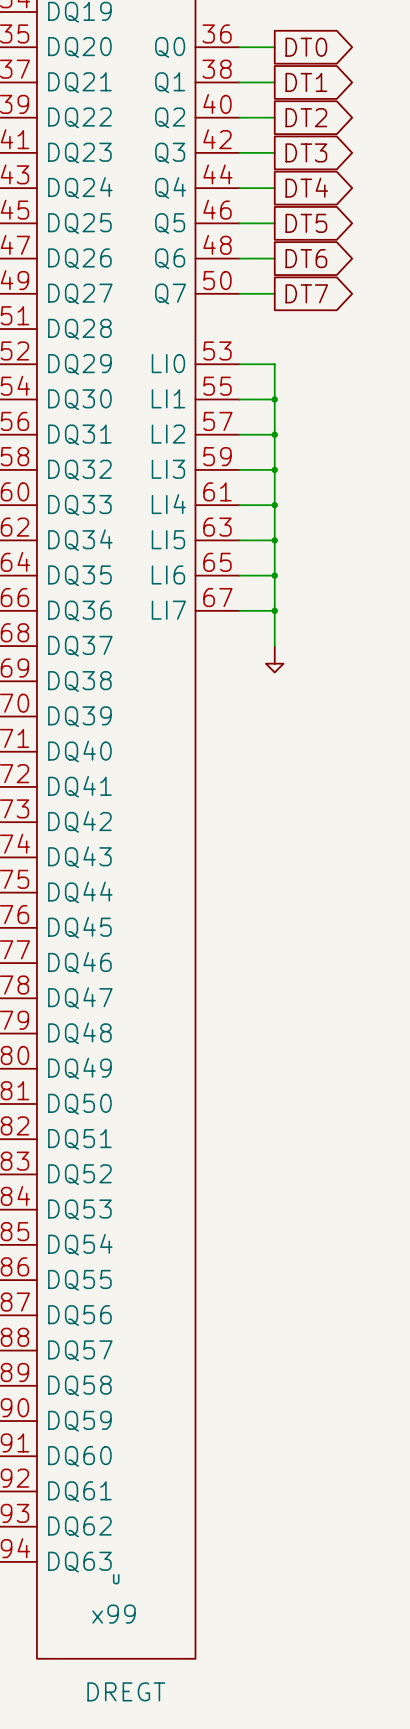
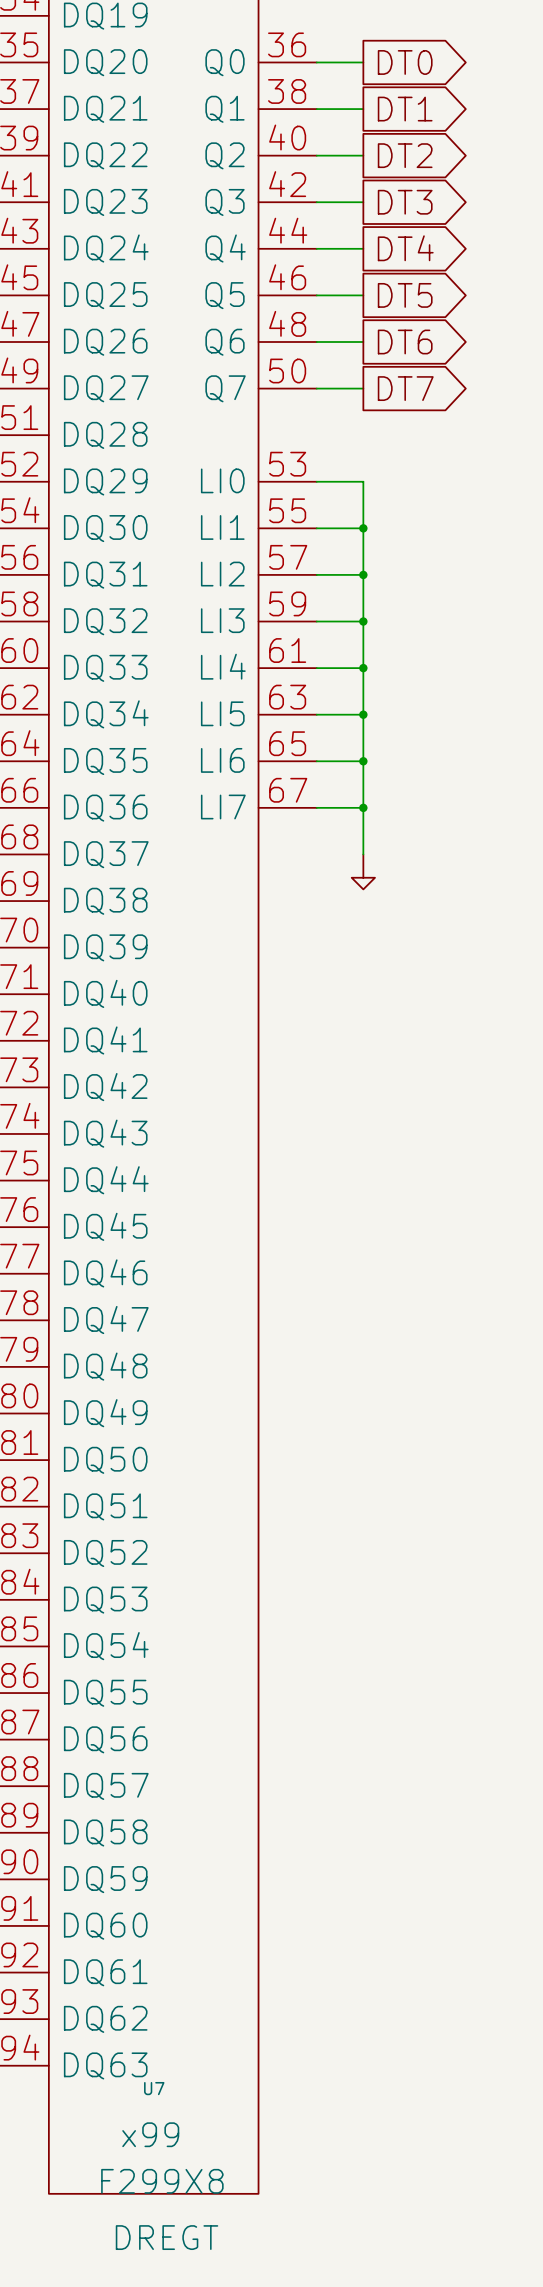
U name: U (116, 1579) -> U7 (154, 2088)
U value: none -> F299X8 (162, 2181)

